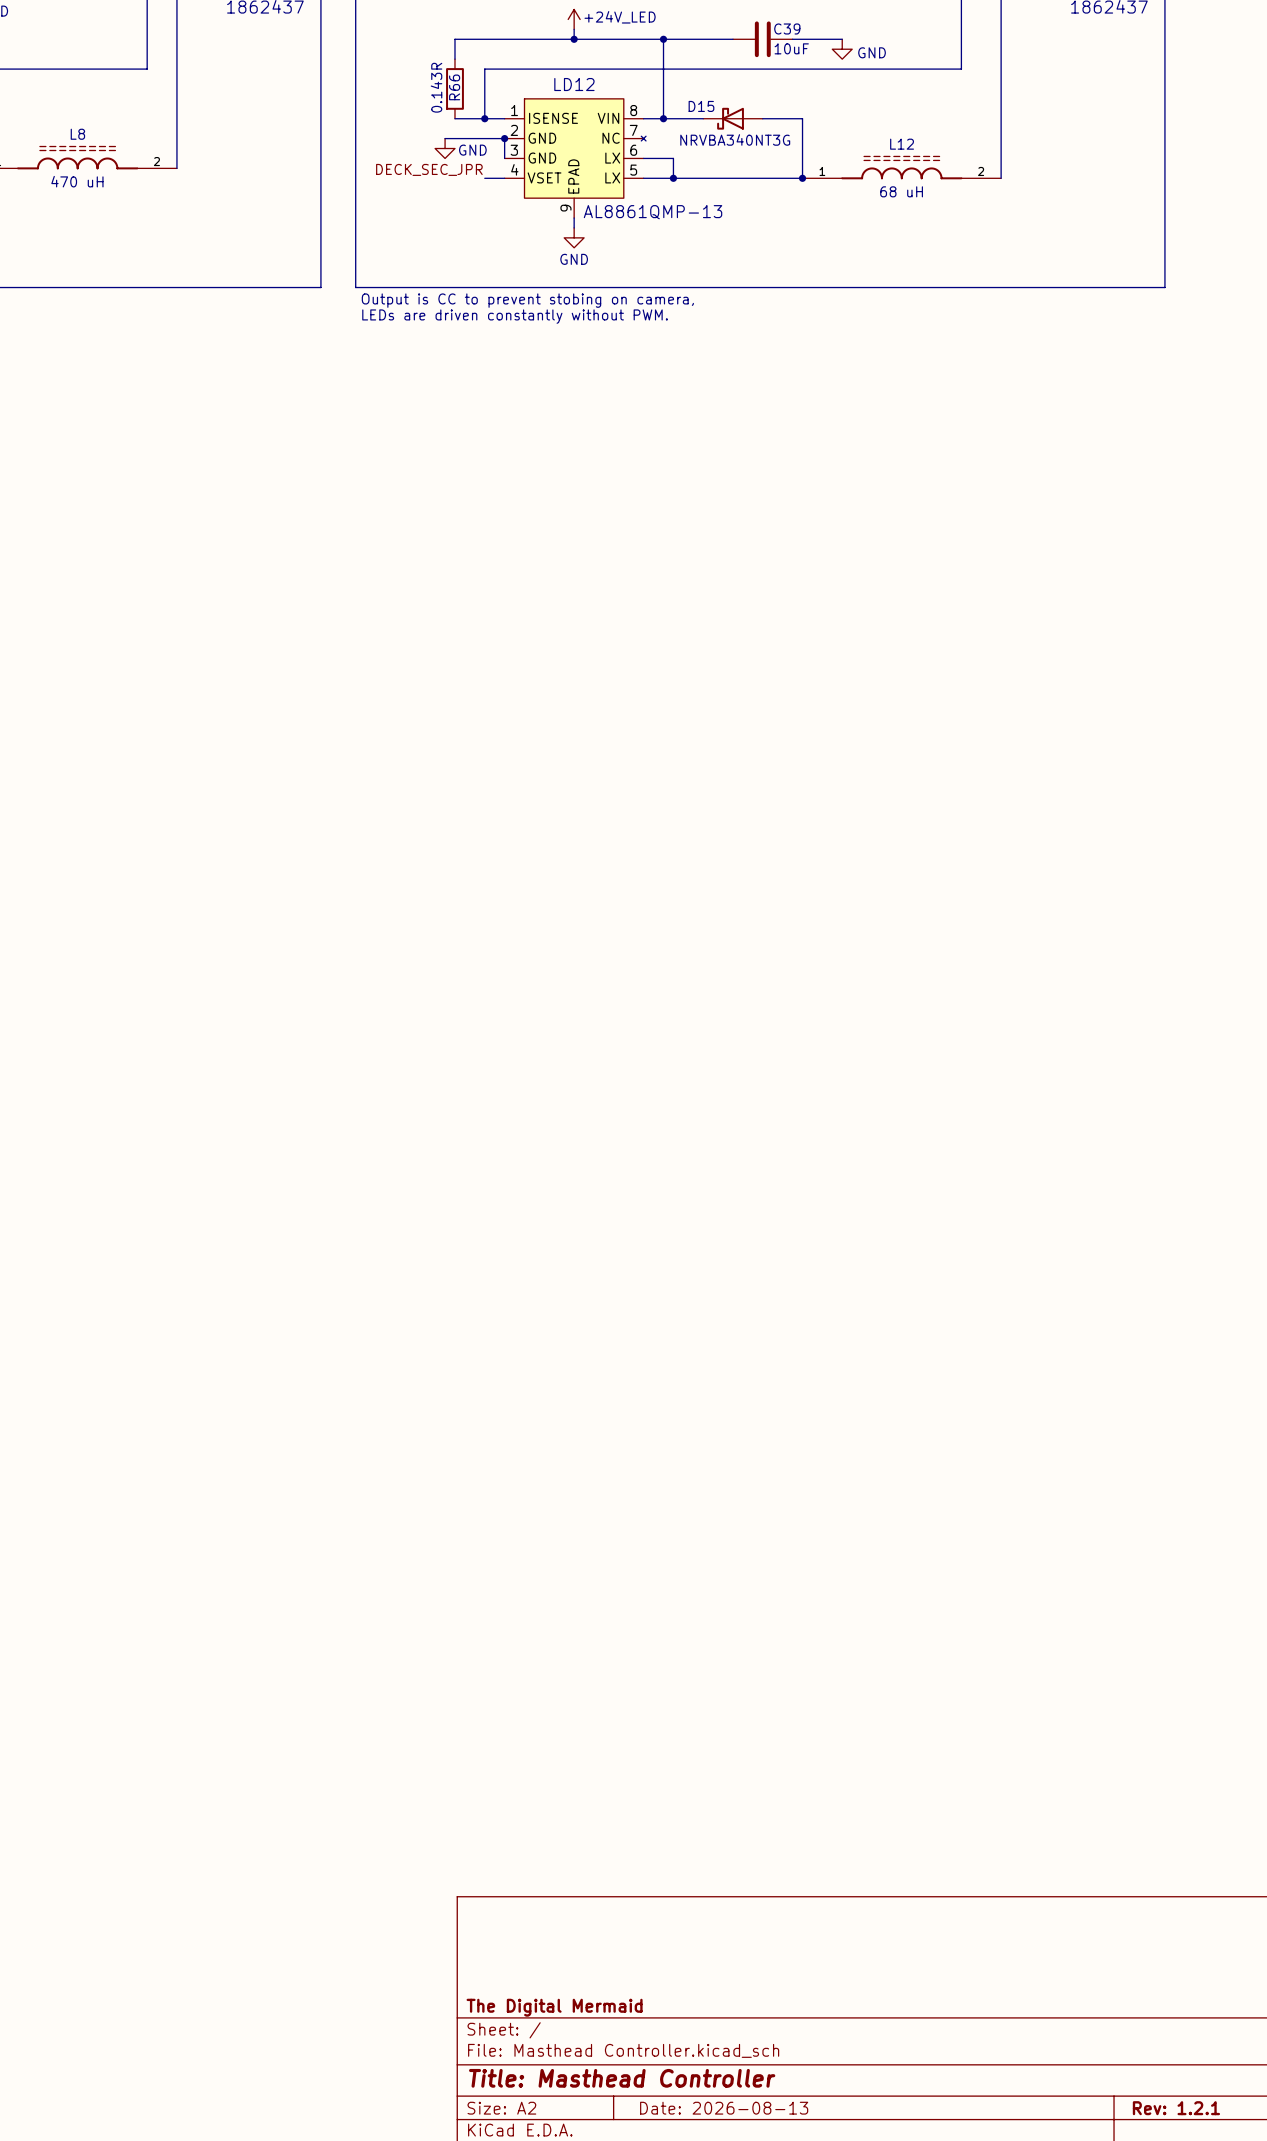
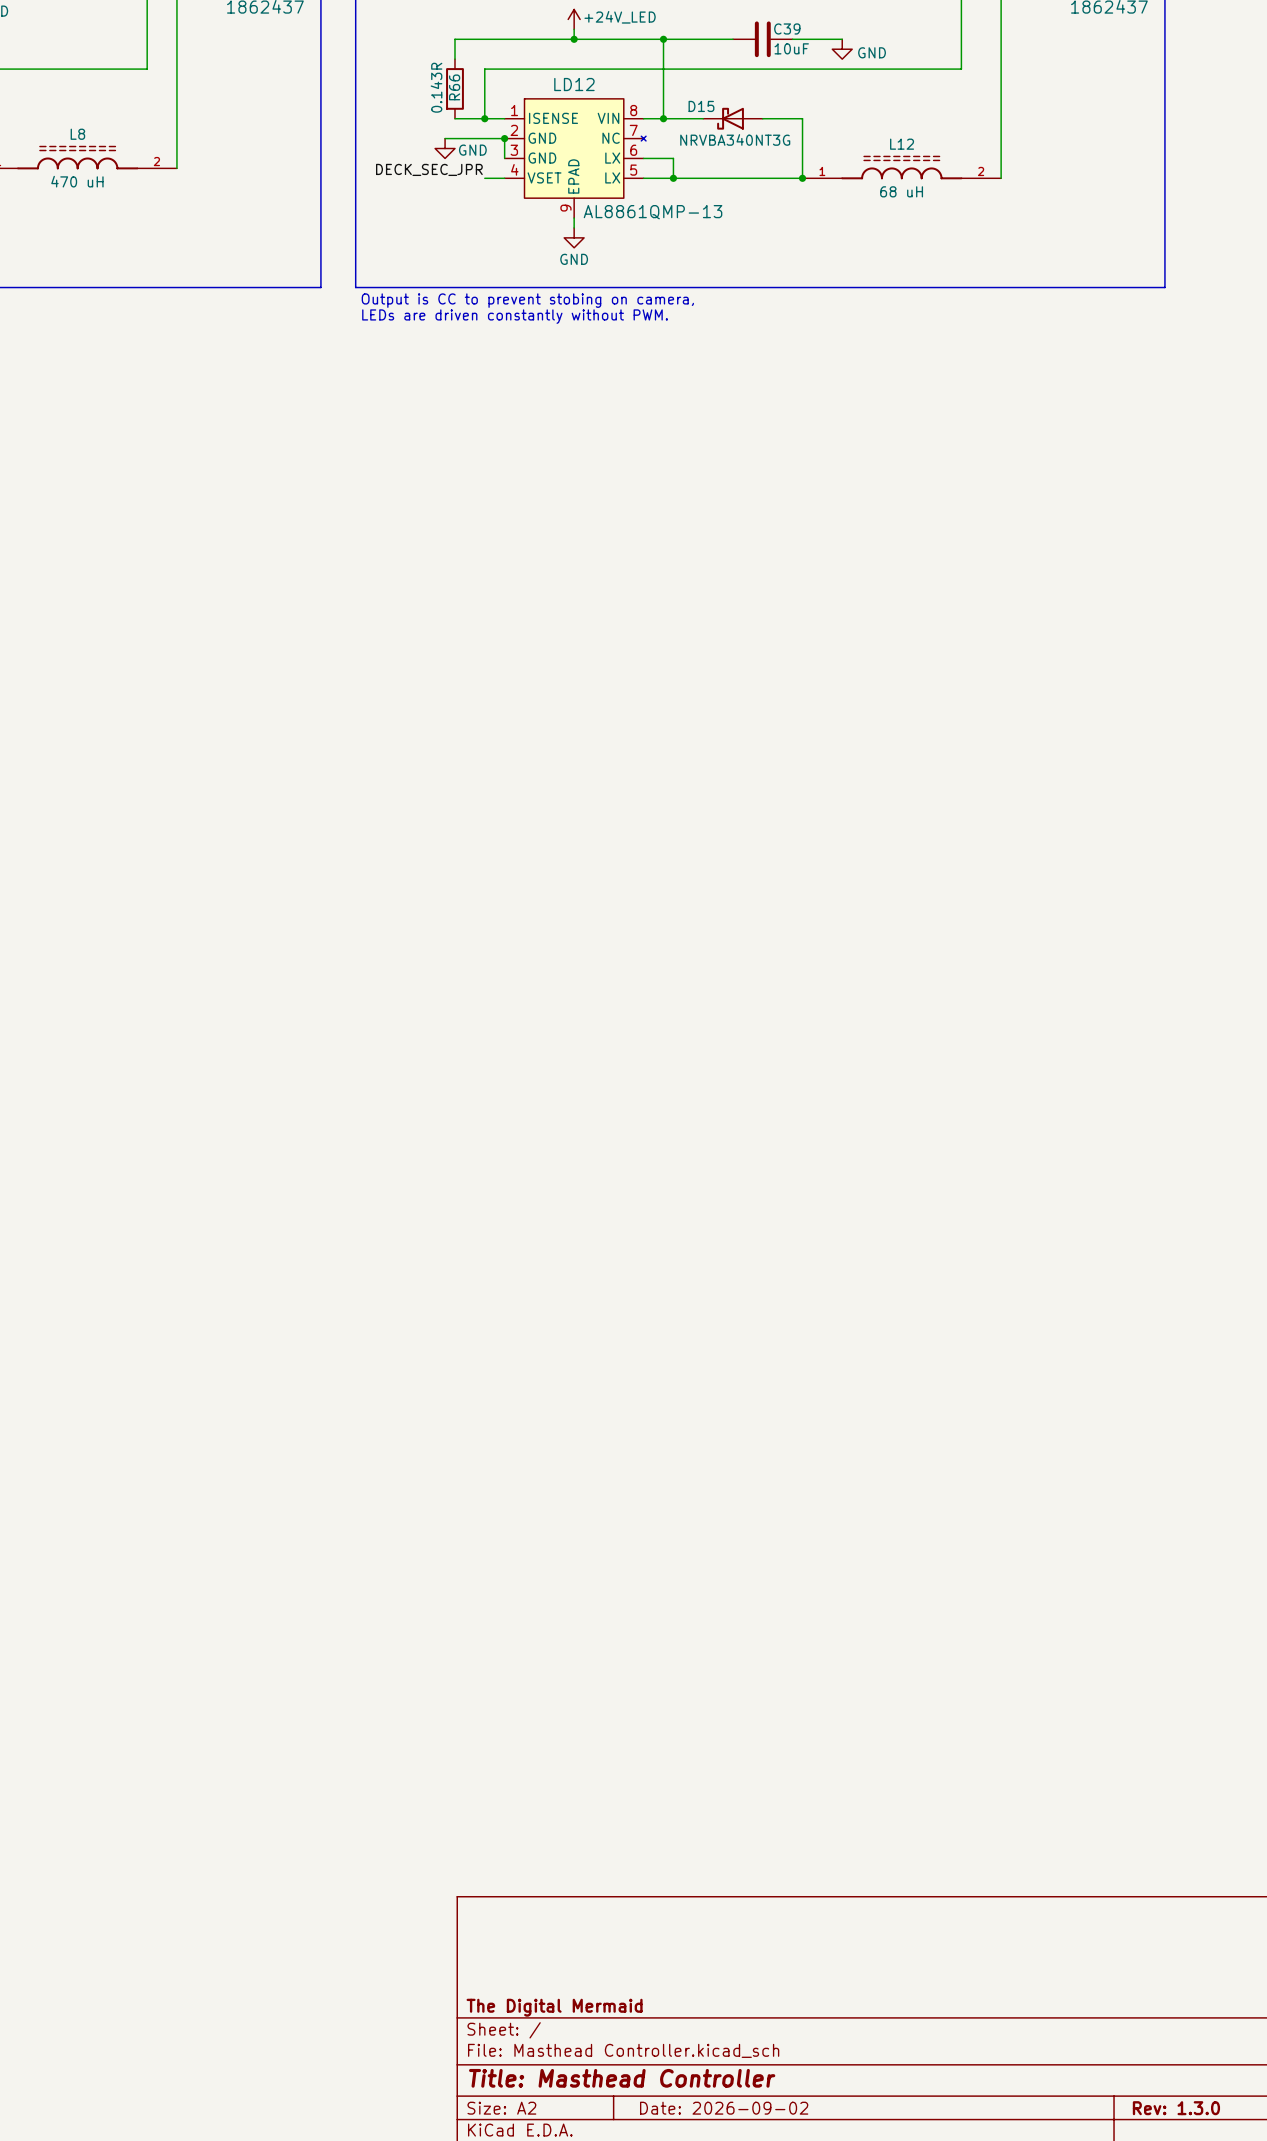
title block: Date: 2026-08-13 (724, 2108) -> Date: 2026-09-02 (724, 2108)
title block: Rev: 1.2.1 (1176, 2108) -> Rev: 1.3.0 (1176, 2108)

